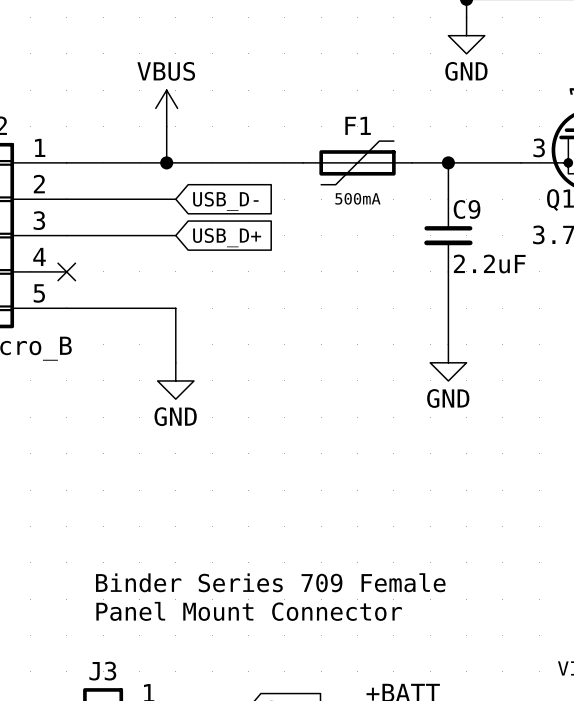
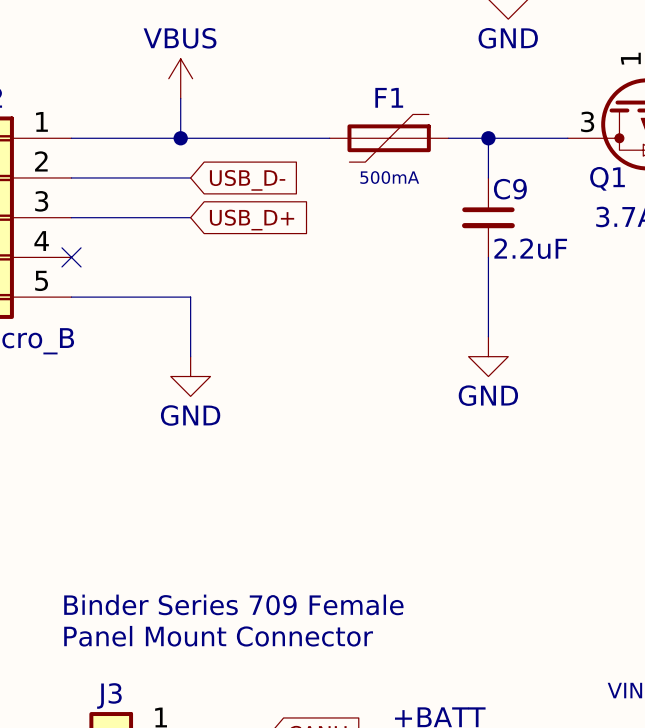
text position: Binder Series 709 Female (270, 582) -> Binder Series 709 Female (233, 604)
text position: Panel Mount Connector (249, 611) -> Panel Mount Connector (218, 636)

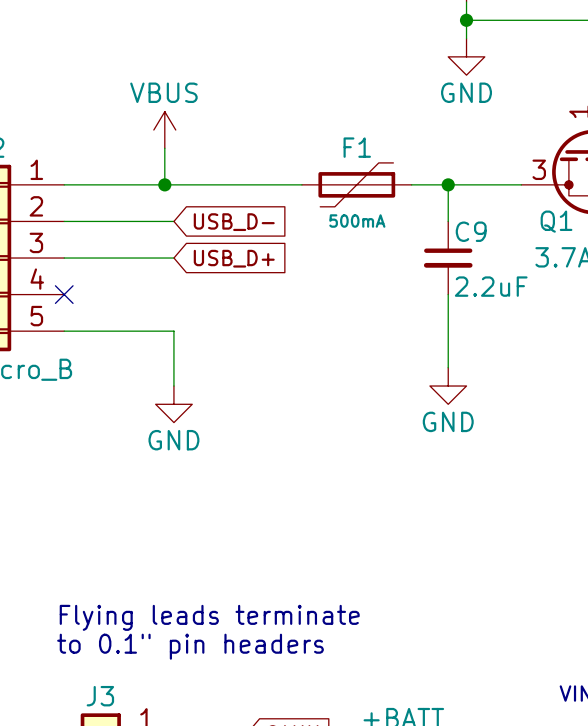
text: Binder Series 709 Female (233, 604) -> Flying leads terminate (209, 617)
text: Panel Mount Connector (218, 636) -> to 0.1" pin headers (190, 646)

